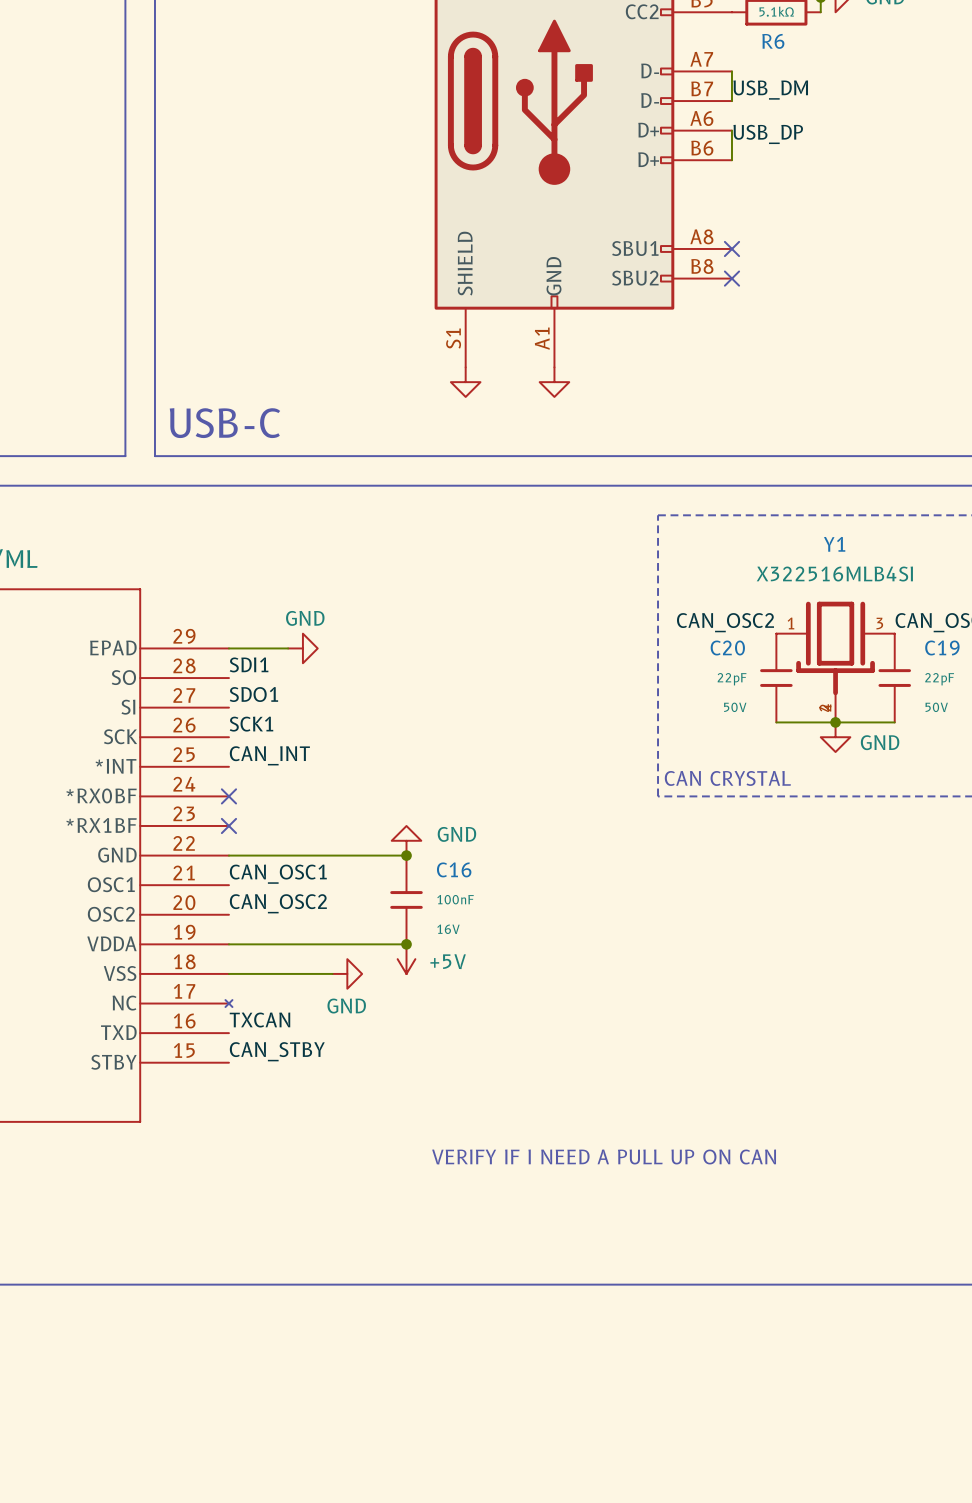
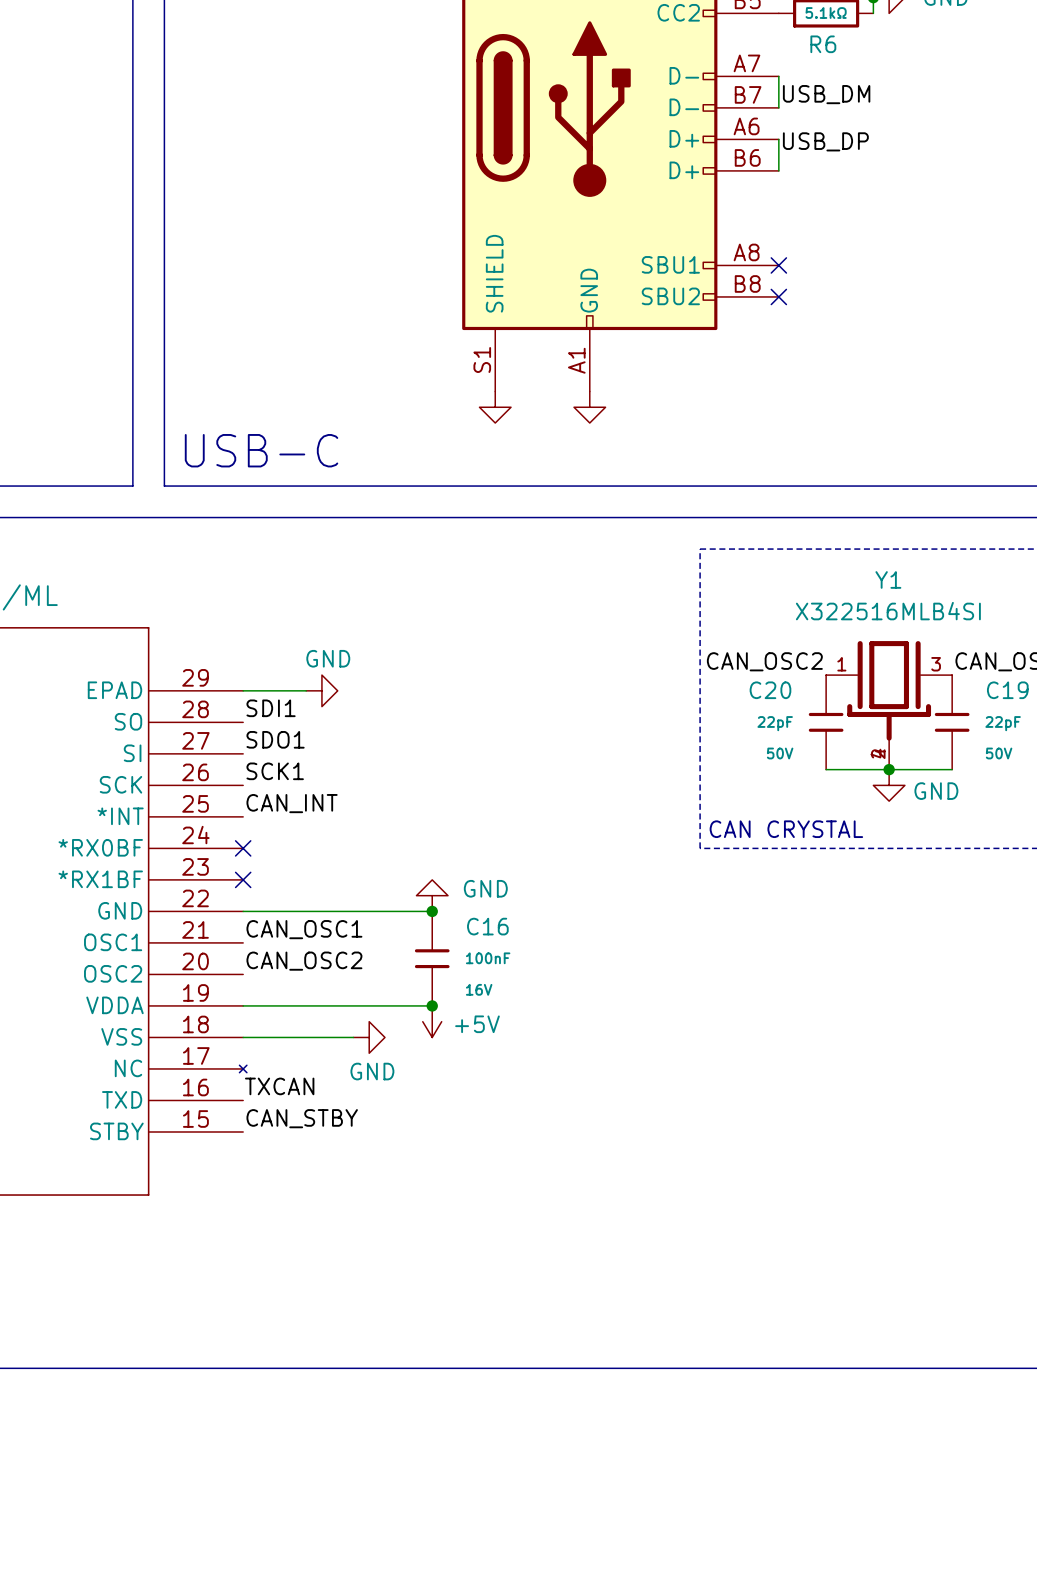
text: VERIFY IF I NEED A PULL UP ON CAN (604, 1156) -> none

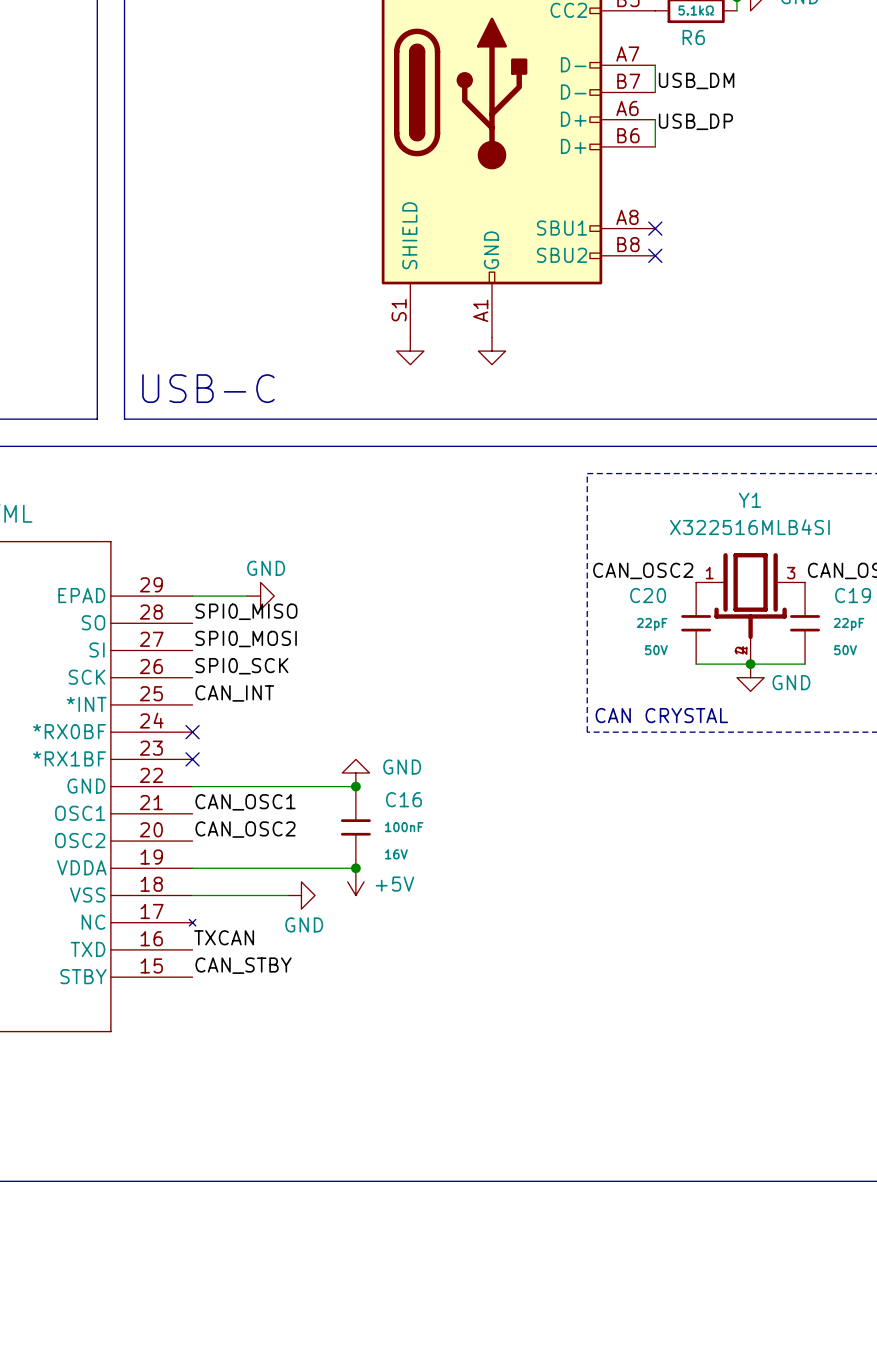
label: SDI1 (271, 708) -> SPI0_MISO (246, 611)
label: SDO1 (275, 739) -> SPI0_MOSI (246, 639)
label: SCK1 (275, 771) -> SPI0_SCK (241, 666)

